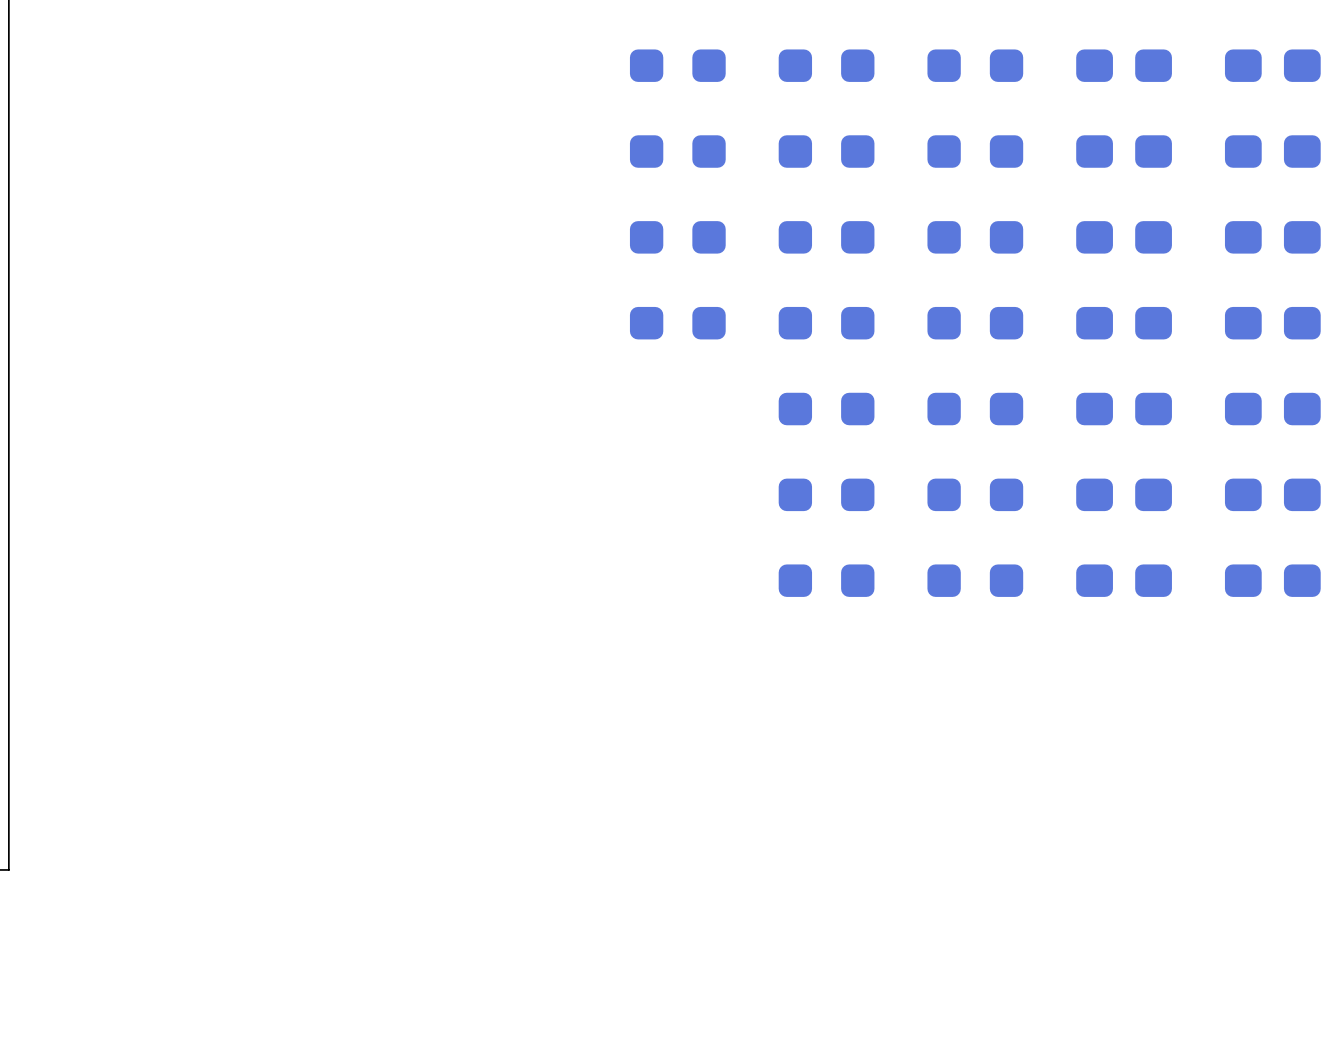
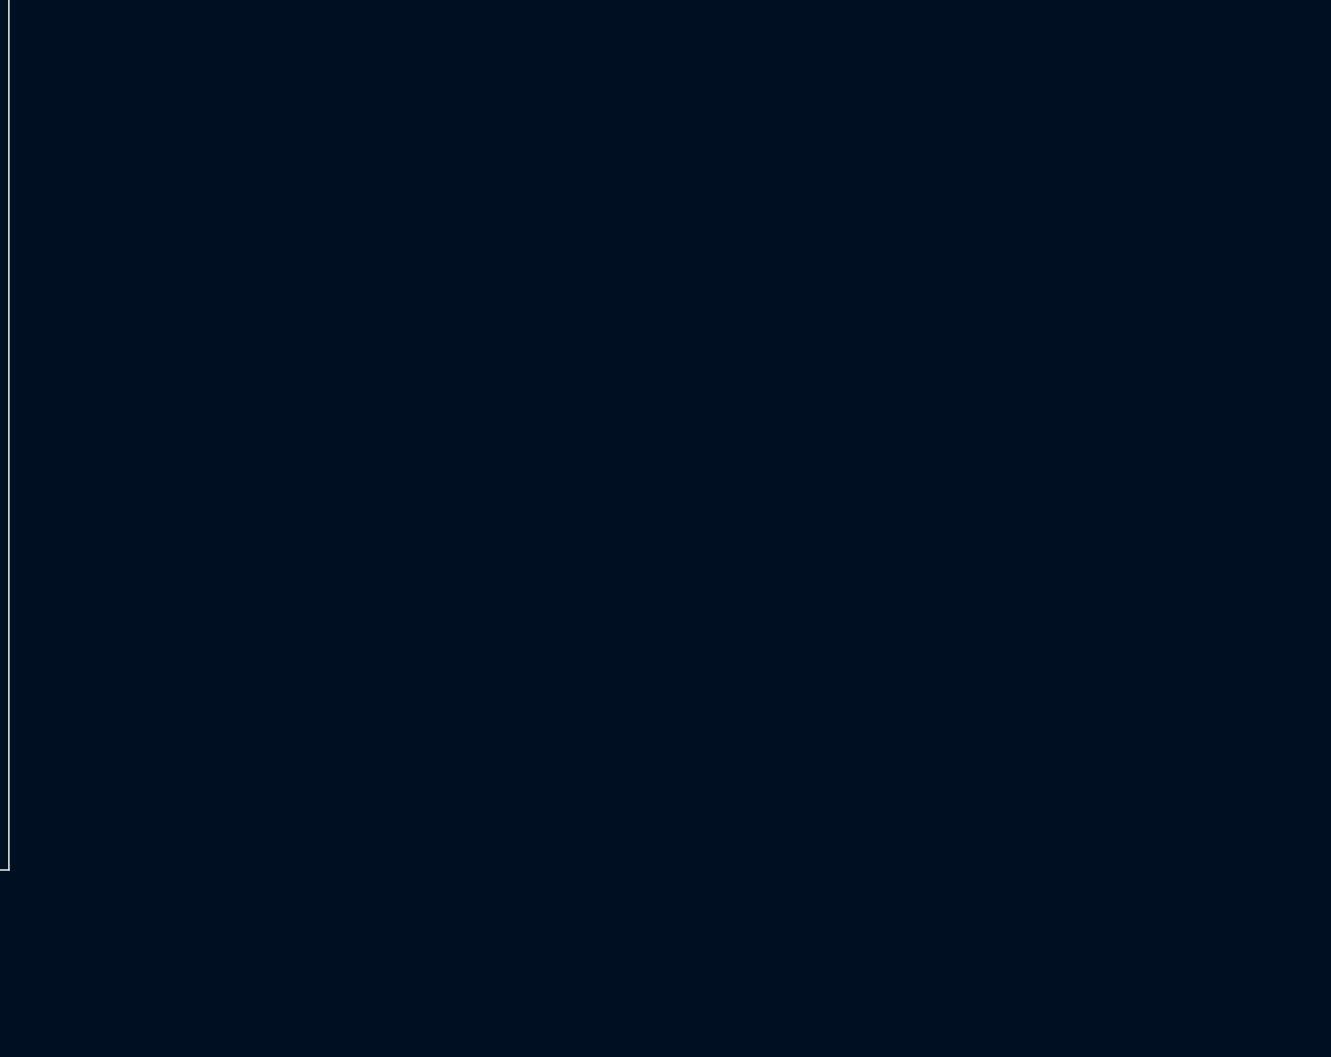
part: (677, 65) -> none
part: (826, 65) -> none
part: (975, 65) -> none
part: (1124, 65) -> none
part: (1272, 65) -> none
part: (677, 151) -> none
part: (826, 151) -> none
part: (975, 151) -> none
part: (1124, 151) -> none
part: (1272, 151) -> none
part: (677, 237) -> none
part: (826, 237) -> none
part: (975, 237) -> none
part: (1124, 237) -> none
part: (1272, 237) -> none
part: (677, 323) -> none
part: (826, 323) -> none
part: (975, 323) -> none
part: (1124, 323) -> none
part: (1272, 323) -> none
part: (826, 409) -> none
part: (975, 409) -> none
part: (1124, 409) -> none
part: (1272, 409) -> none
part: (826, 494) -> none
part: (975, 494) -> none
part: (1124, 494) -> none
part: (1272, 494) -> none
part: (826, 580) -> none
part: (975, 580) -> none
part: (1124, 580) -> none
part: (1272, 580) -> none

